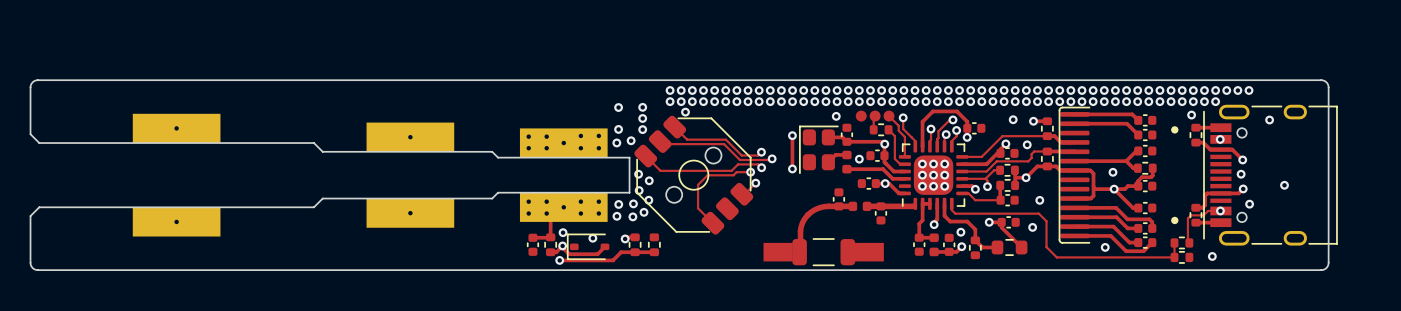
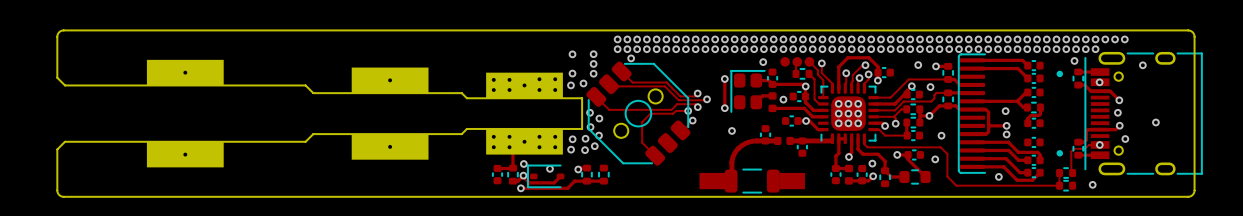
track: (1138, 186) (1114, 189) (1133, 208) (1138, 208) -> none
via: none -> (731, 130)
via: none -> (1006, 134)

